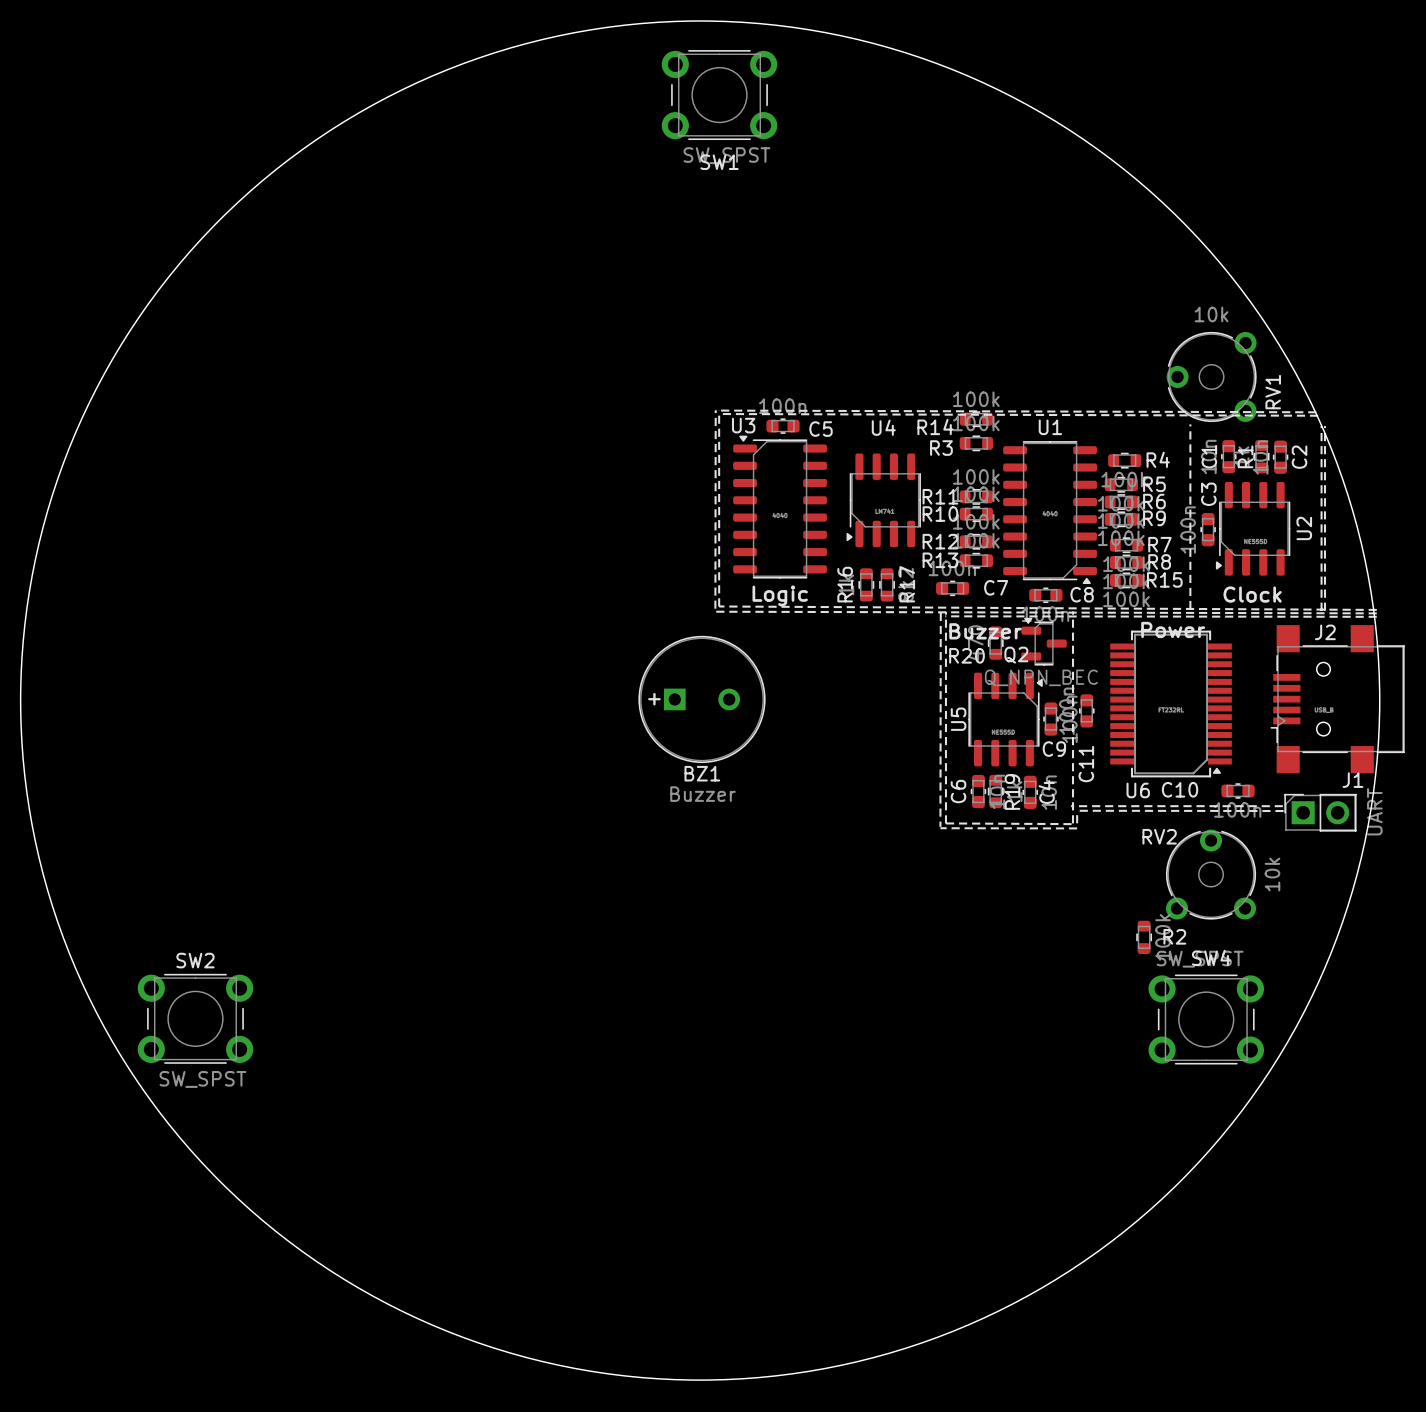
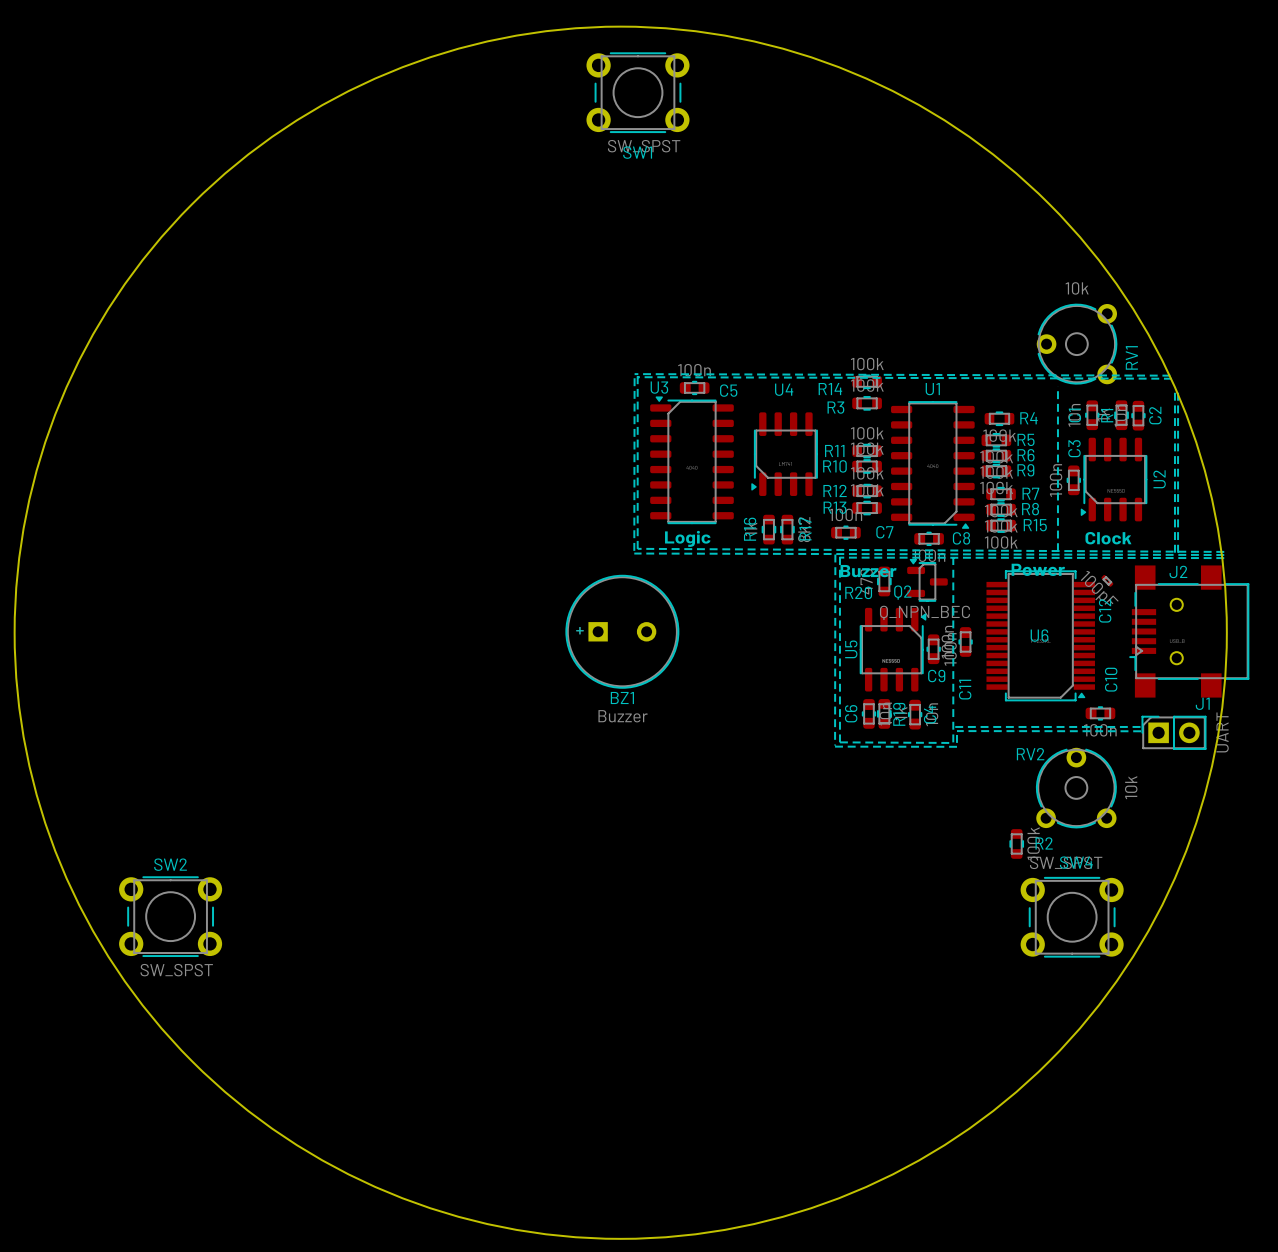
C12: none -> 100pF (1107, 580)
C10 name rotation: 0° (1180, 789) -> 90° counterclockwise (1111, 679)
C10 name position: C10 (1180, 789) -> C10 (1111, 679)
U6 name position: U6 (1138, 790) -> U6 (1039, 635)

